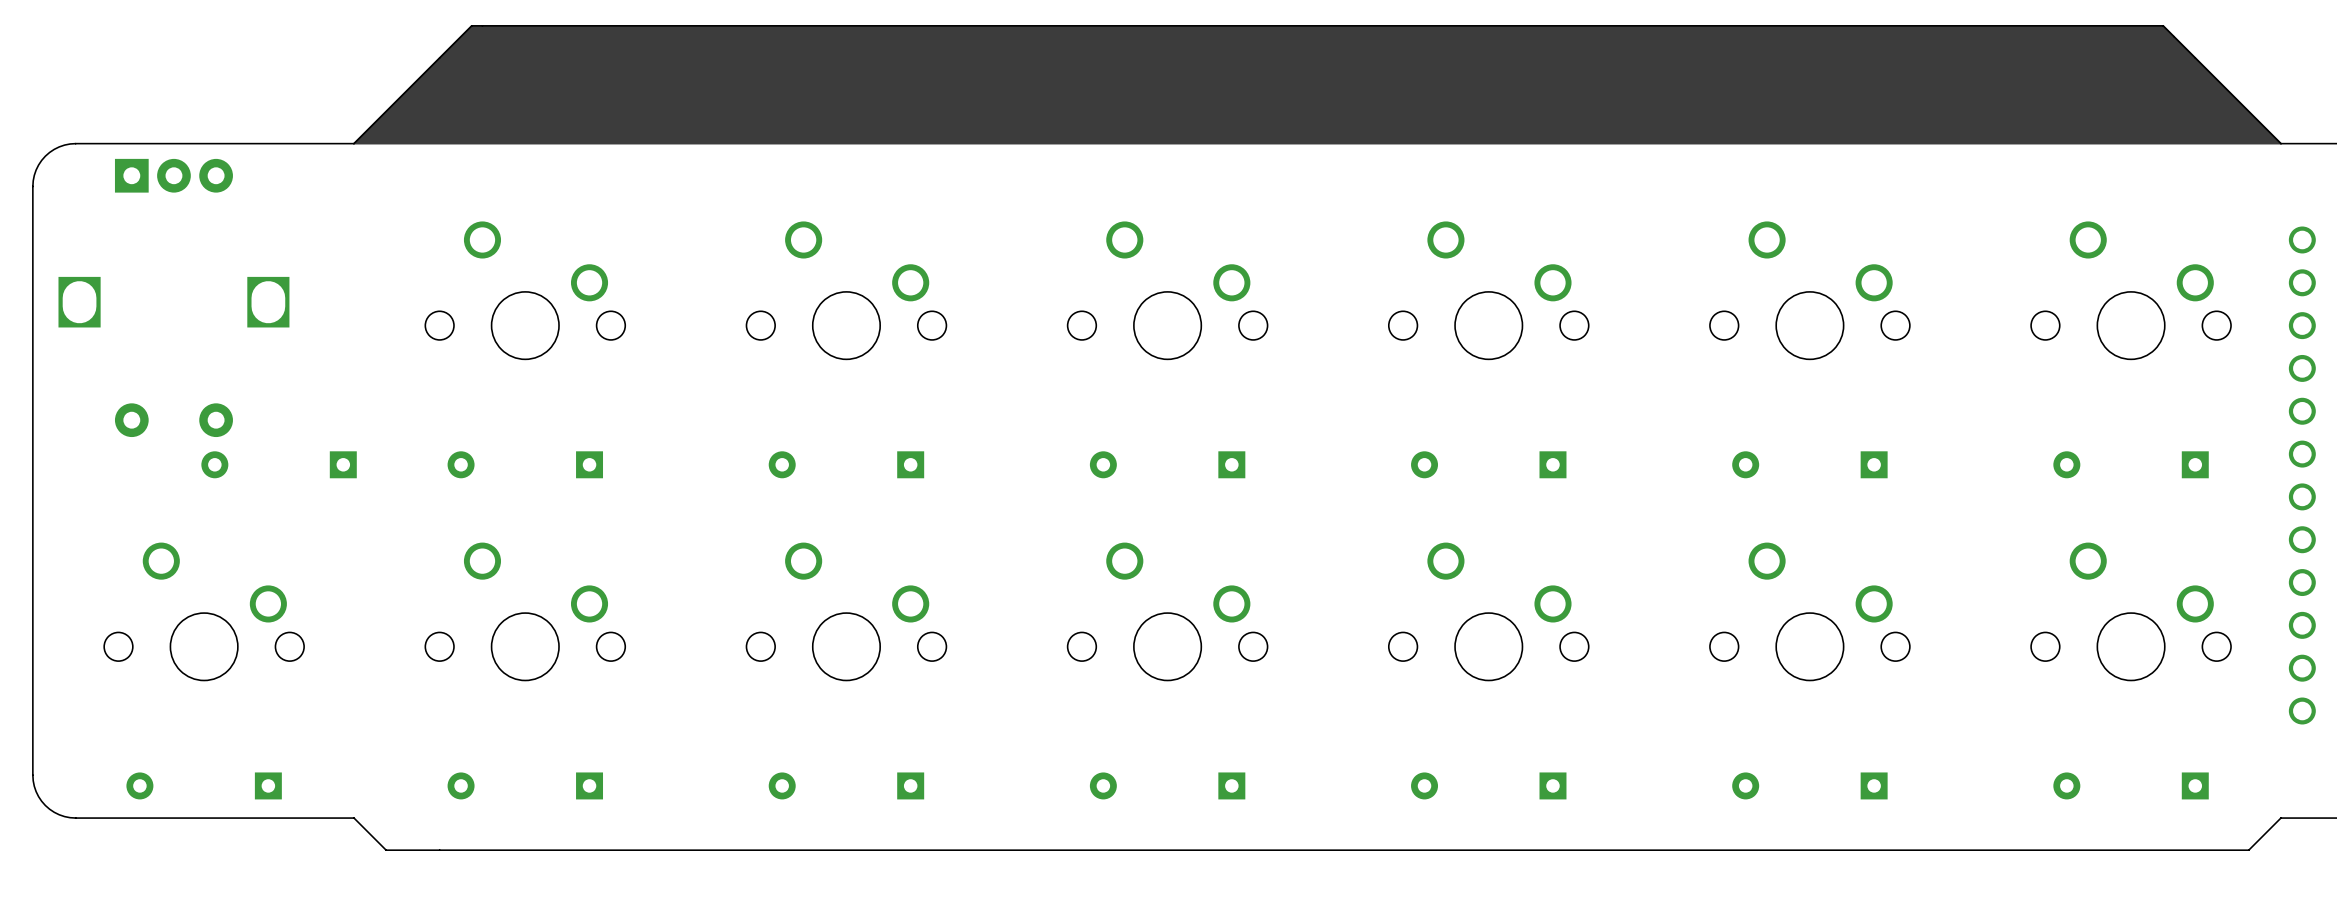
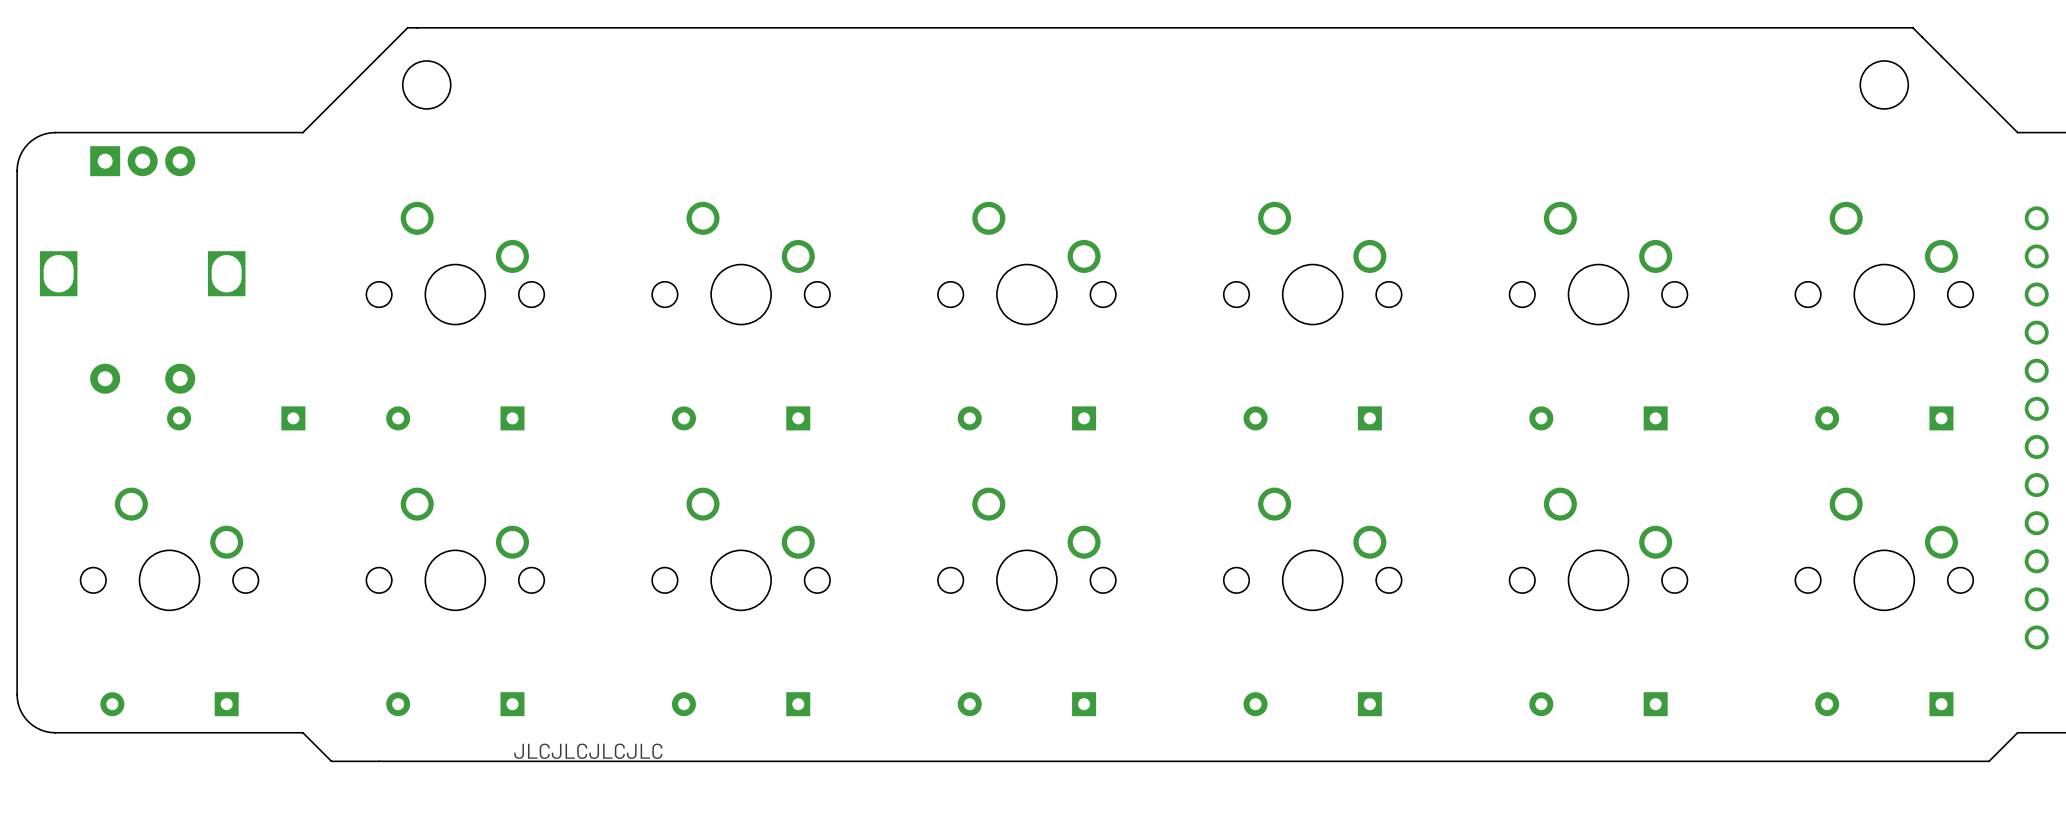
drawing: [353, 25, 2282, 145] -> none
text: none -> JLCJLCJLCJLC (588, 751)

